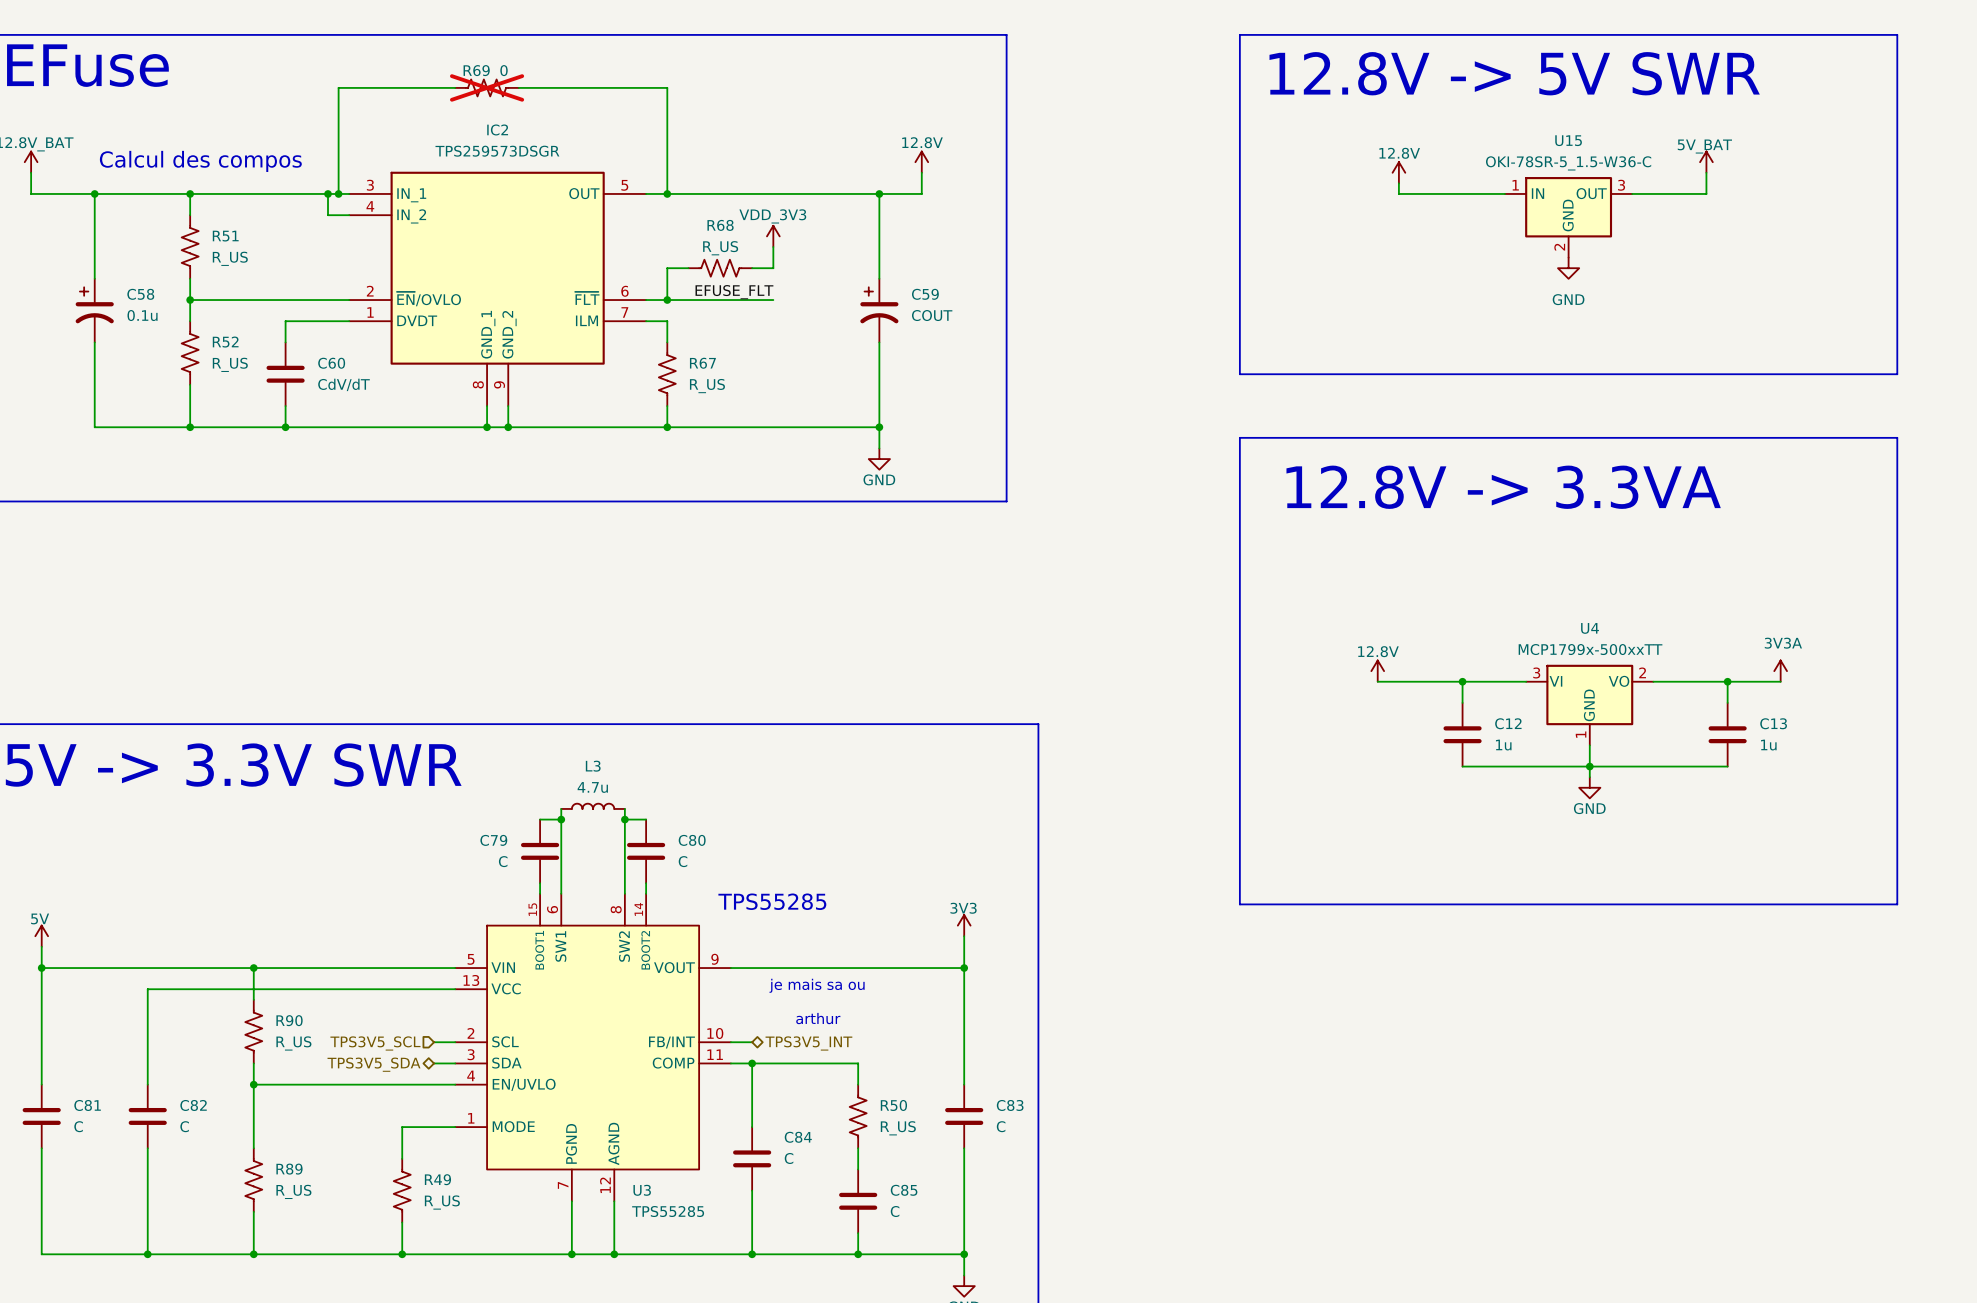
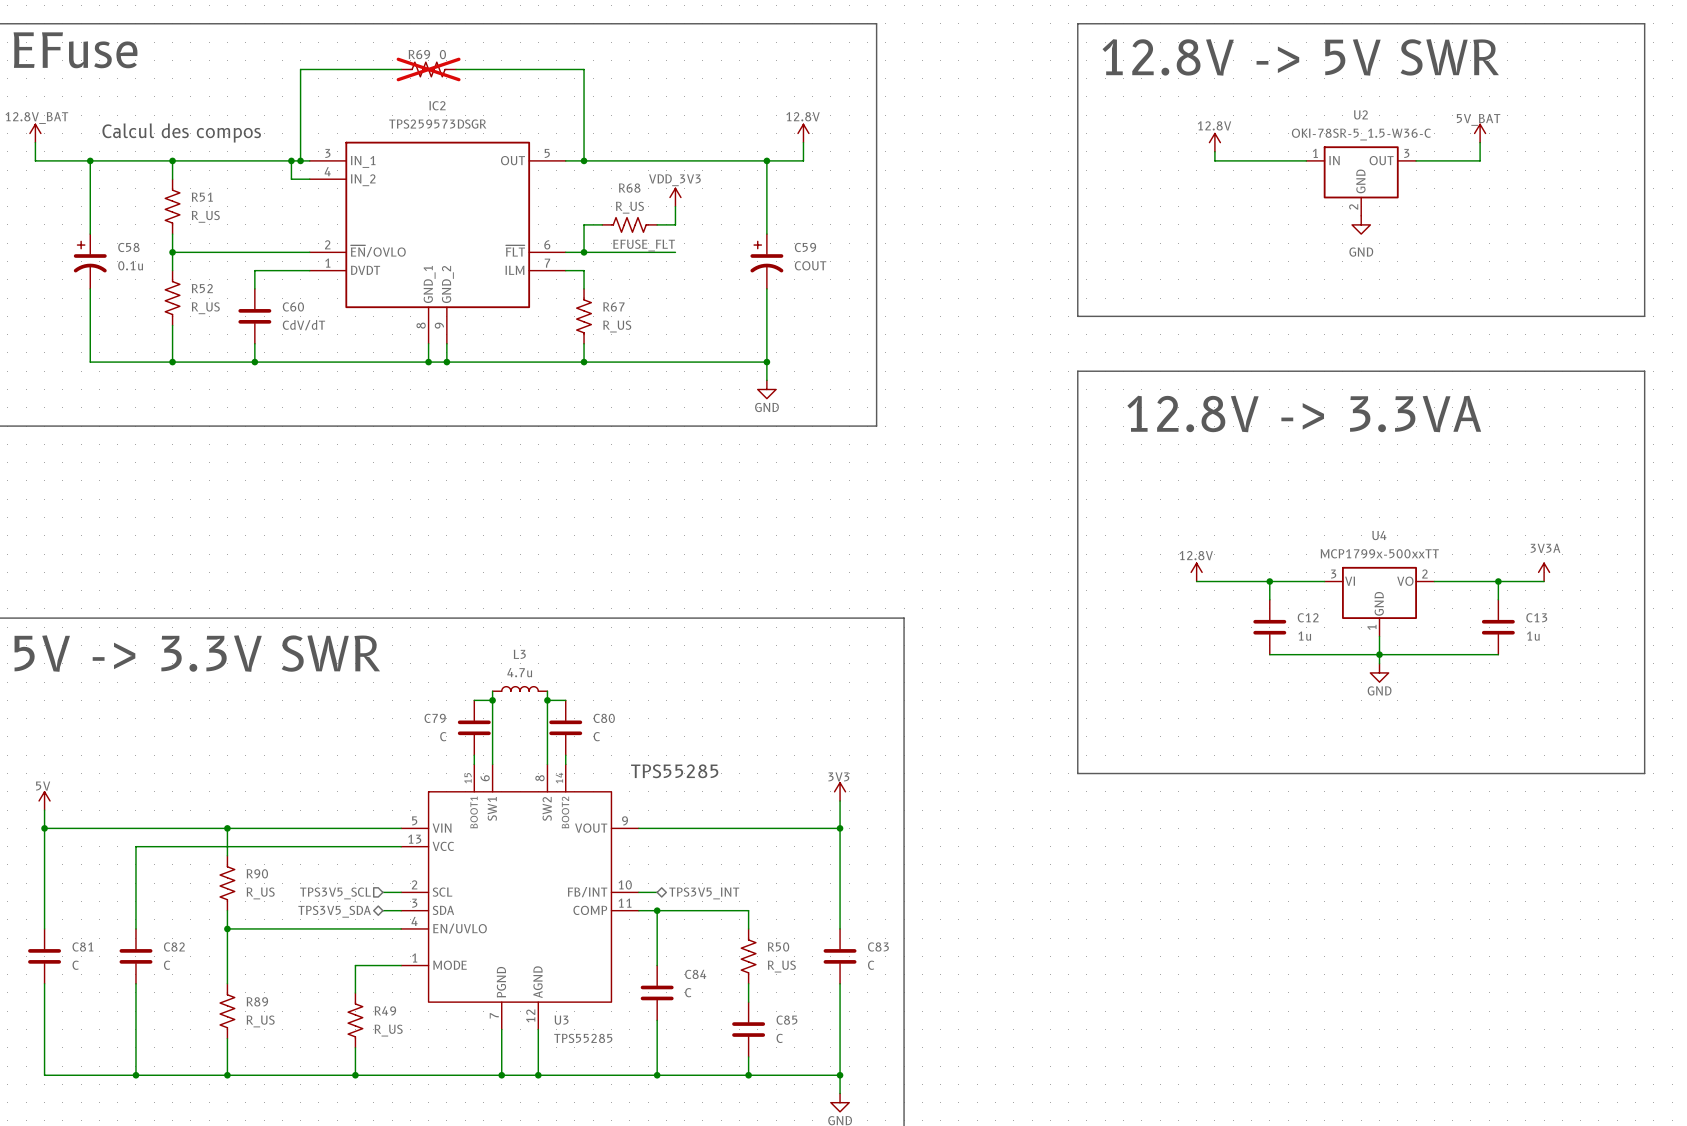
U15 name: U15 (1568, 140) -> U2 (1360, 114)
text: je mais sa ou (817, 985) -> none
text: arthur (818, 1018) -> none

